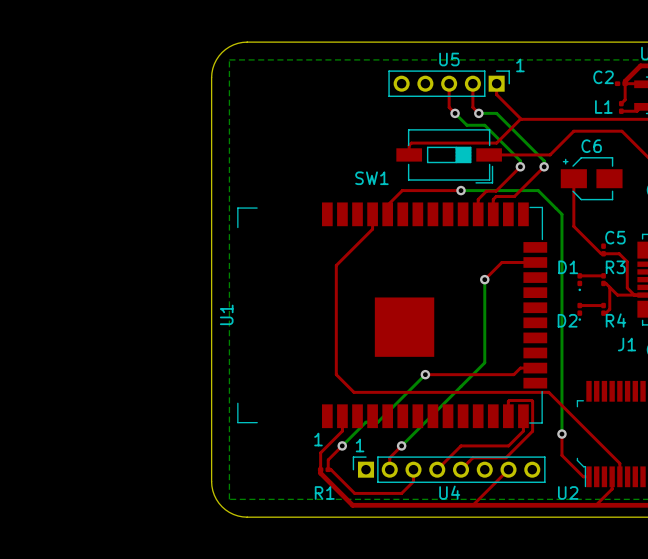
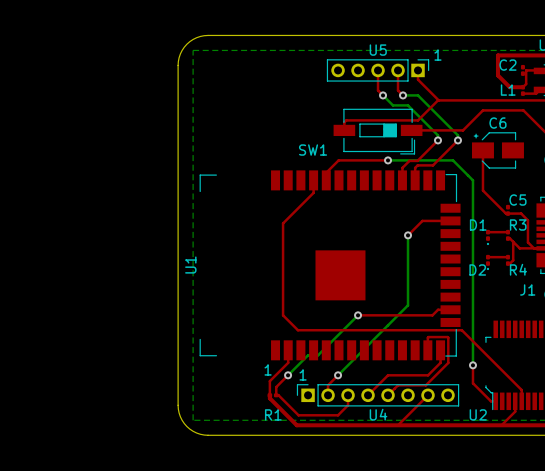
top track: (640, 65) (625, 81) (625, 83) -> (539, 55) (497, 55) (497, 75) (509, 87) (520, 87)
C2 rotation: 0° (621, 83) -> 90° clockwise (522, 70)

